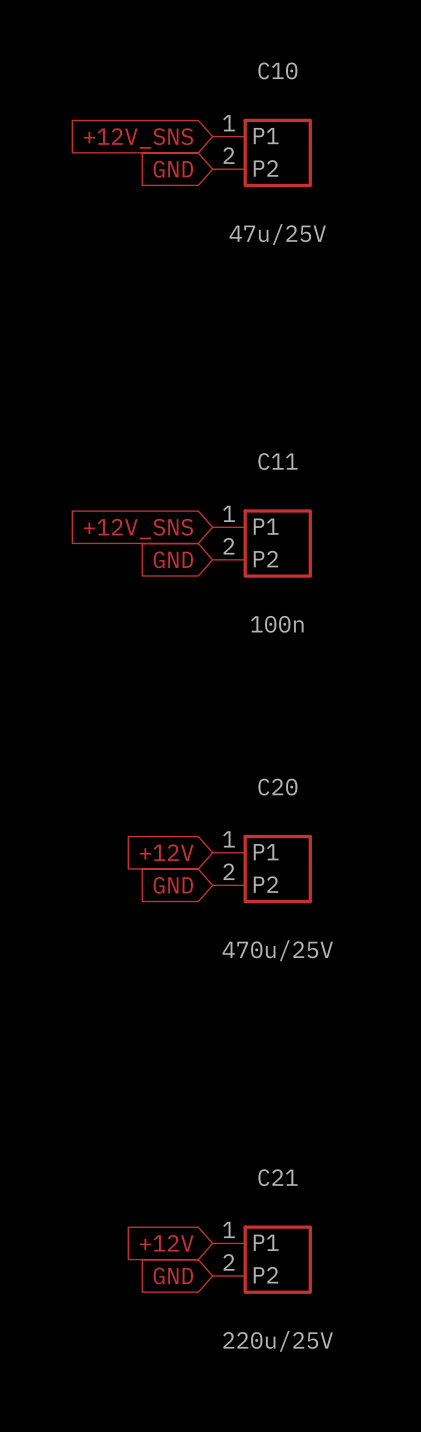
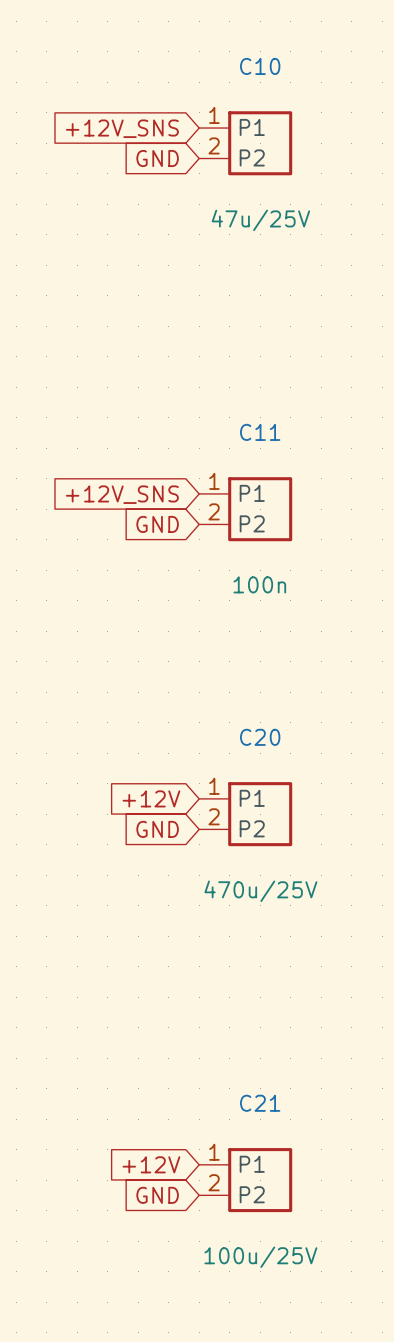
C21 value: 220u/25V (278, 1341) -> 100u/25V (260, 1257)

